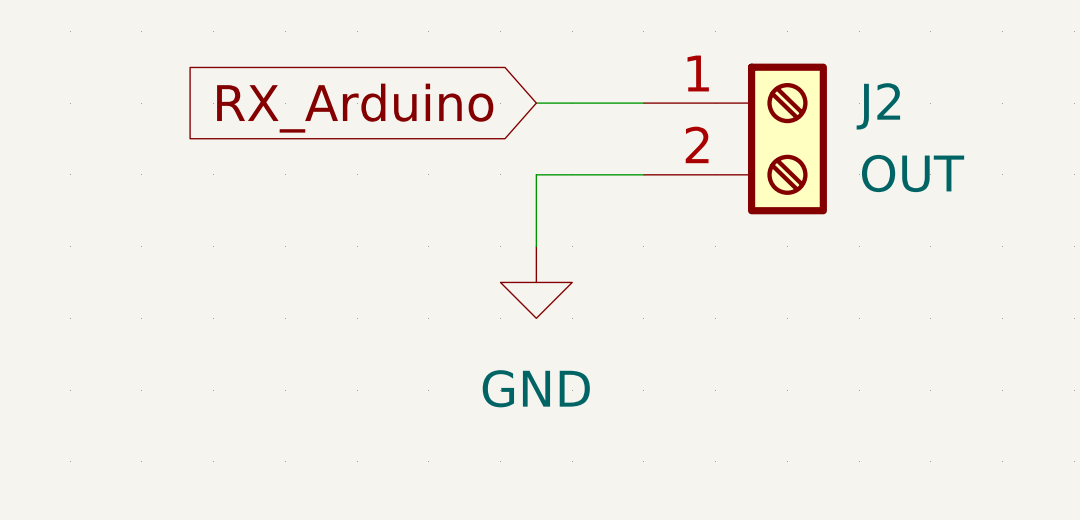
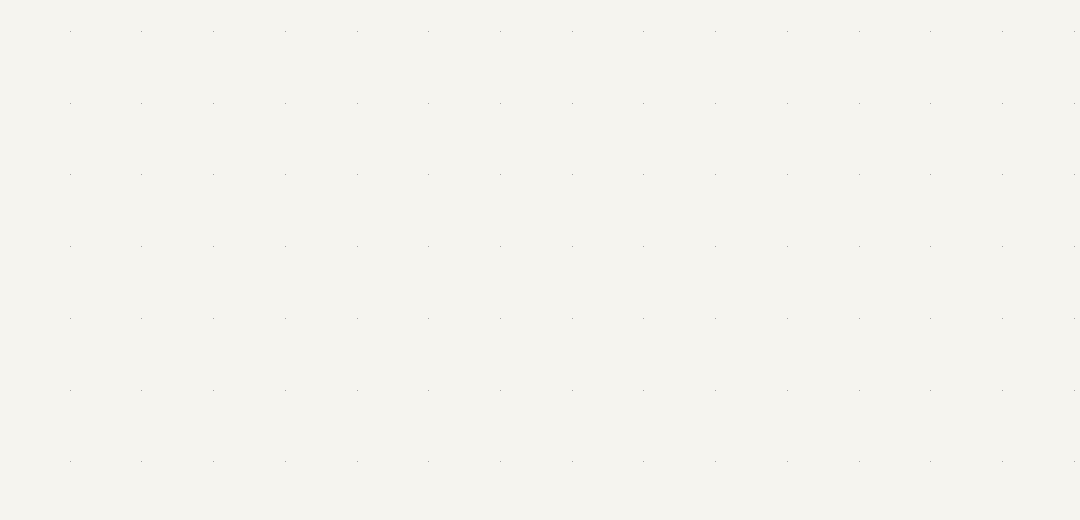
wire: (536, 103) (643, 103) -> none
global label: RX_Arduino (355, 108) -> none
J2: OUT (735, 138) -> none
wire: (643, 174) (536, 174) (536, 246) -> none
power symbol: GND (536, 282) -> none

